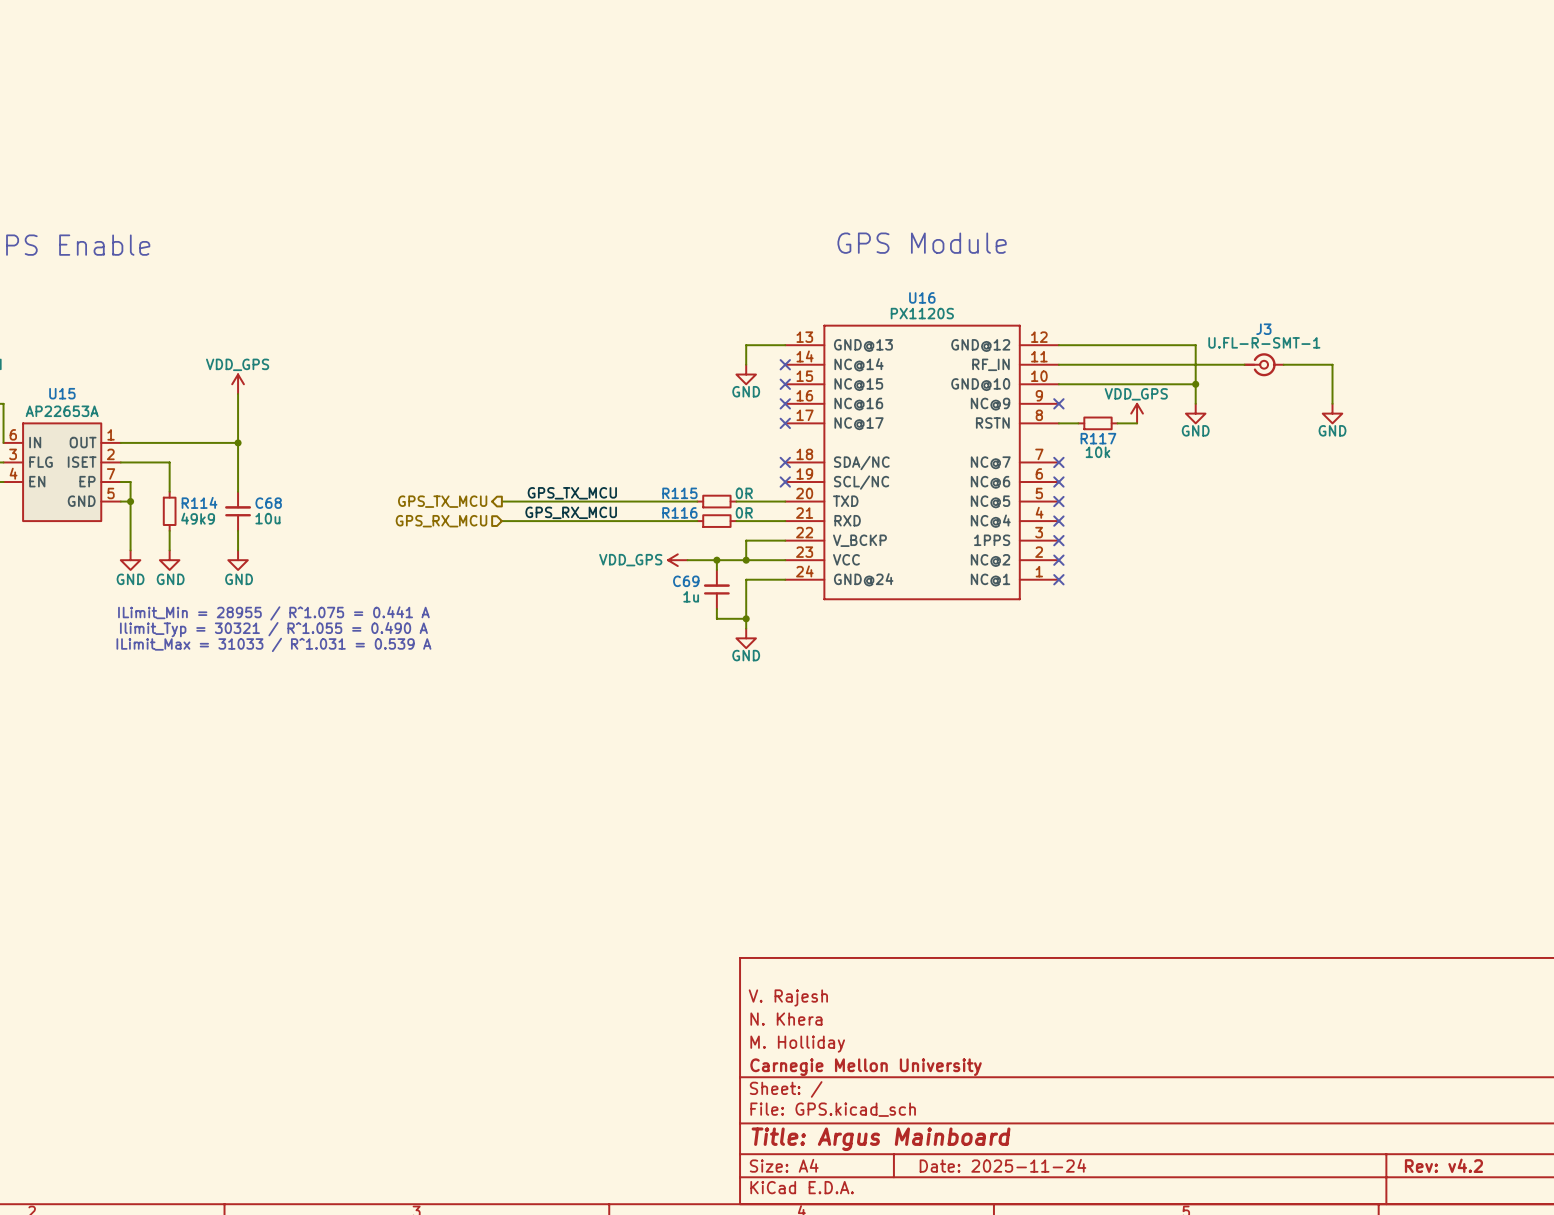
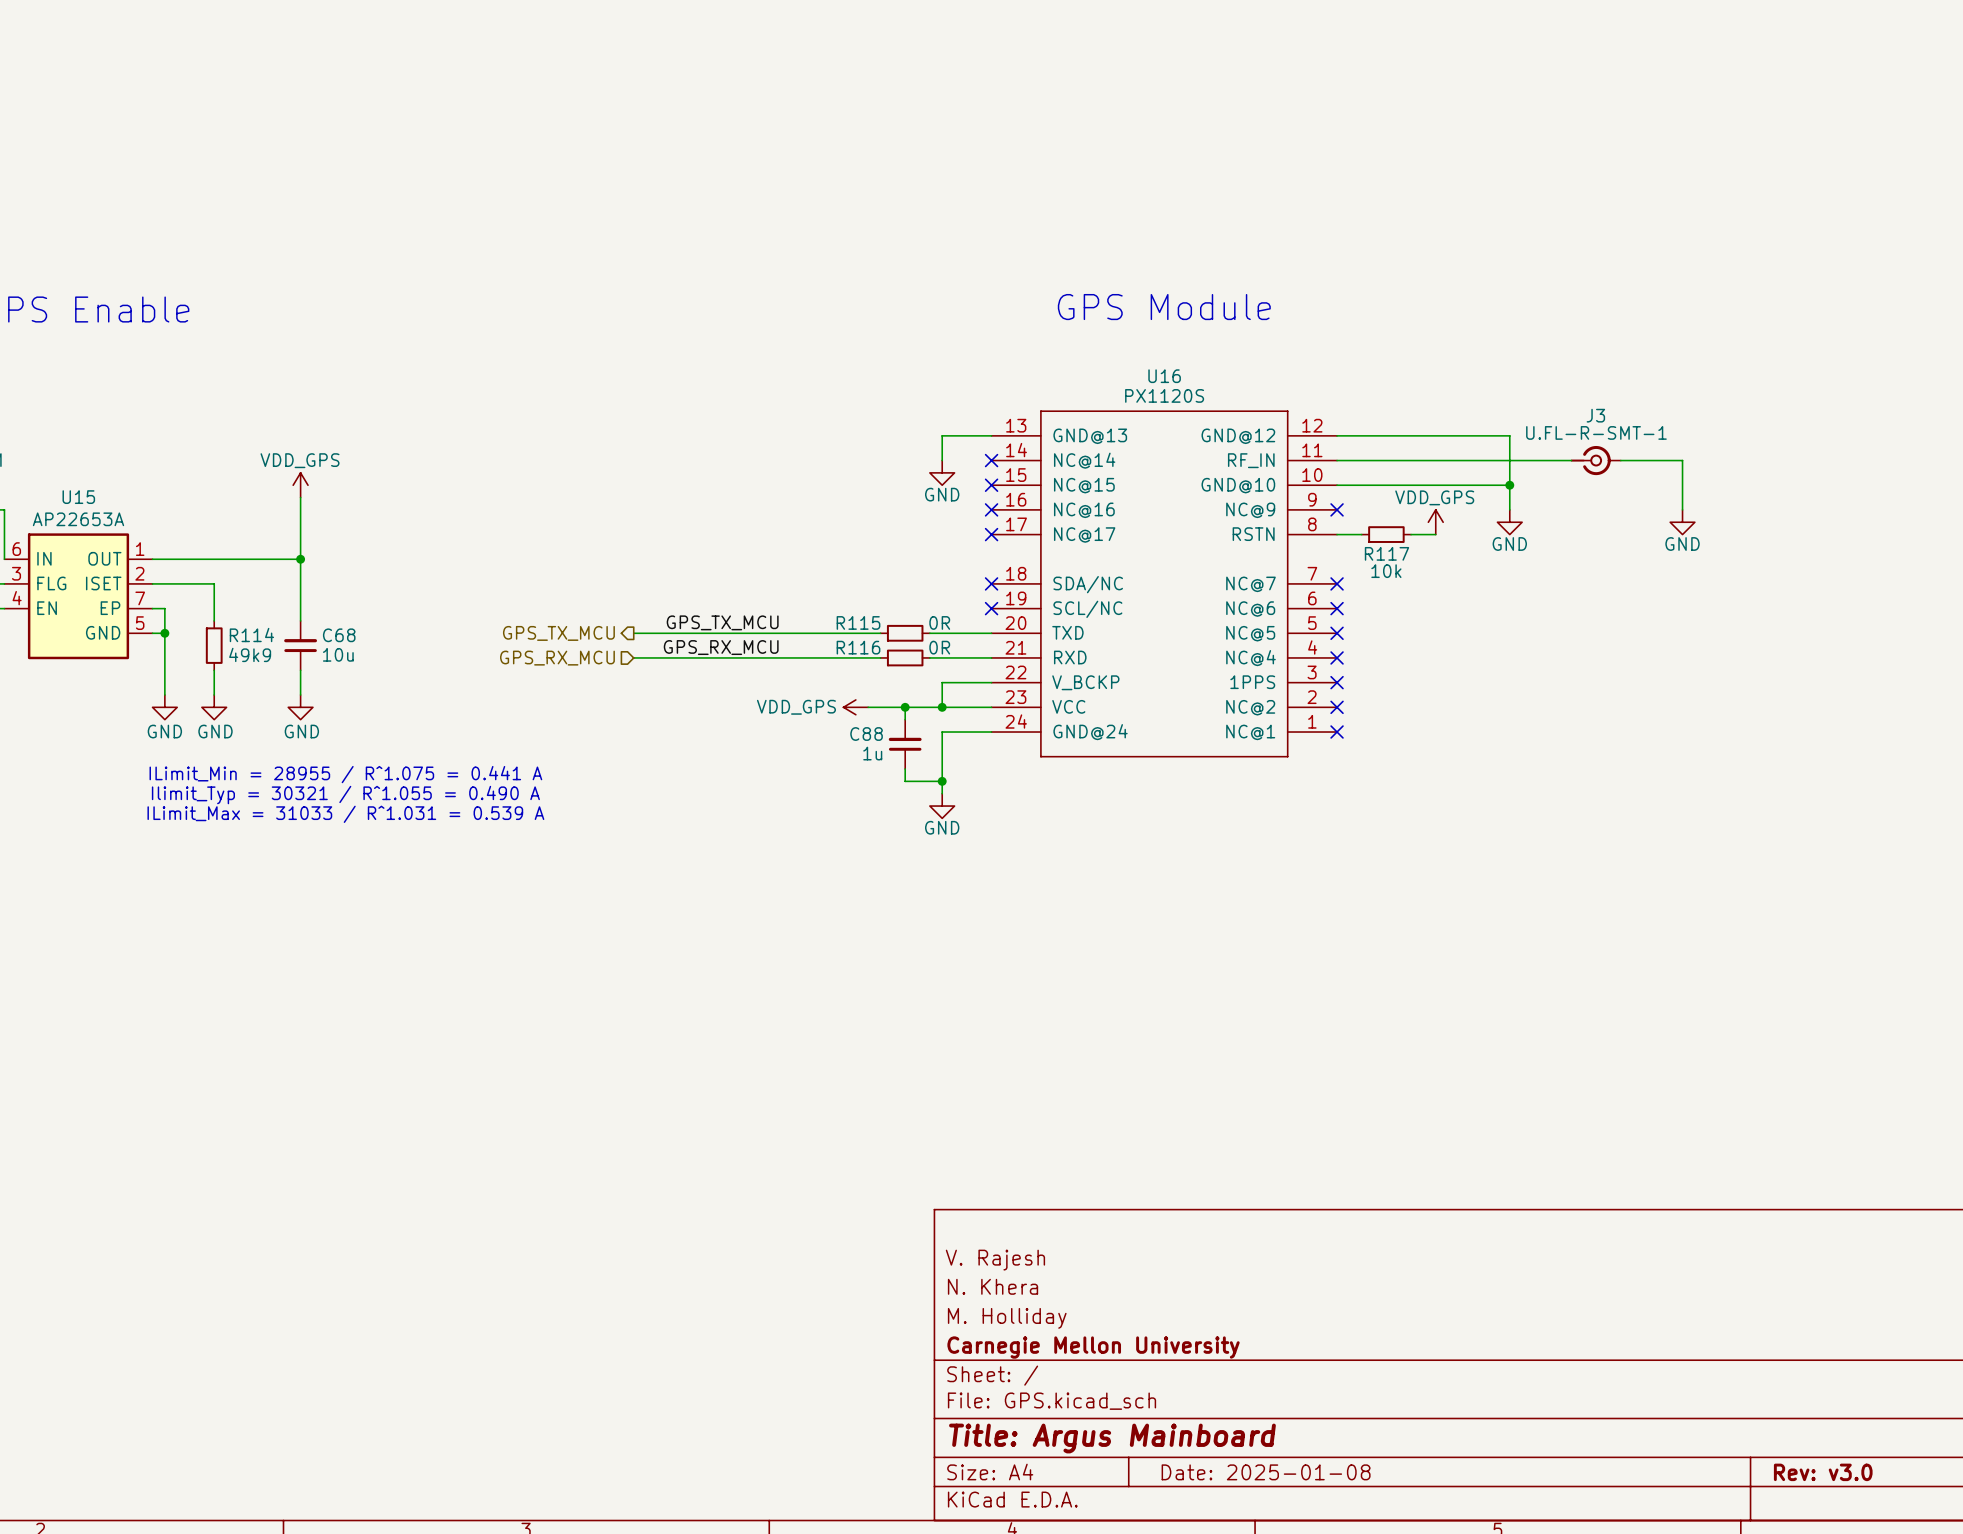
C69 name: C69 (686, 581) -> C88 (866, 734)
title block: Date: 2025-11-24 (1002, 1165) -> Date: 2025-01-08 (1266, 1472)
title block: Rev: v4.2 (1443, 1165) -> Rev: v3.0 (1823, 1472)

